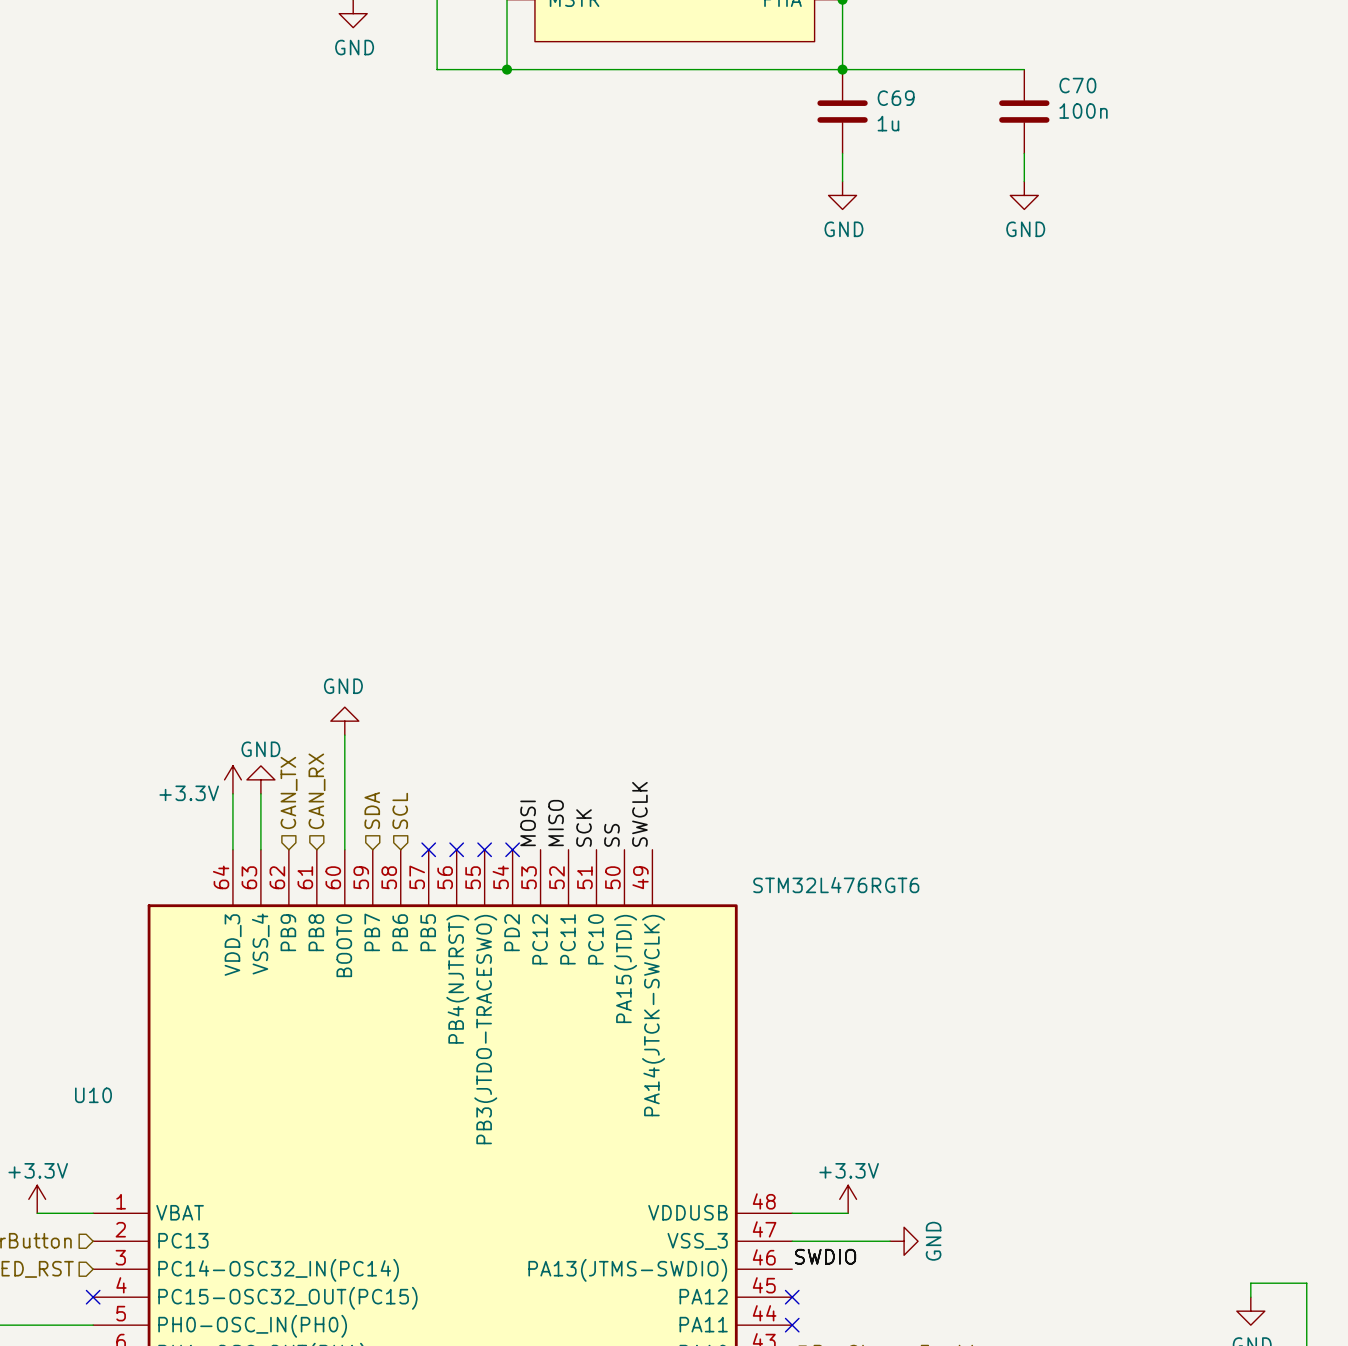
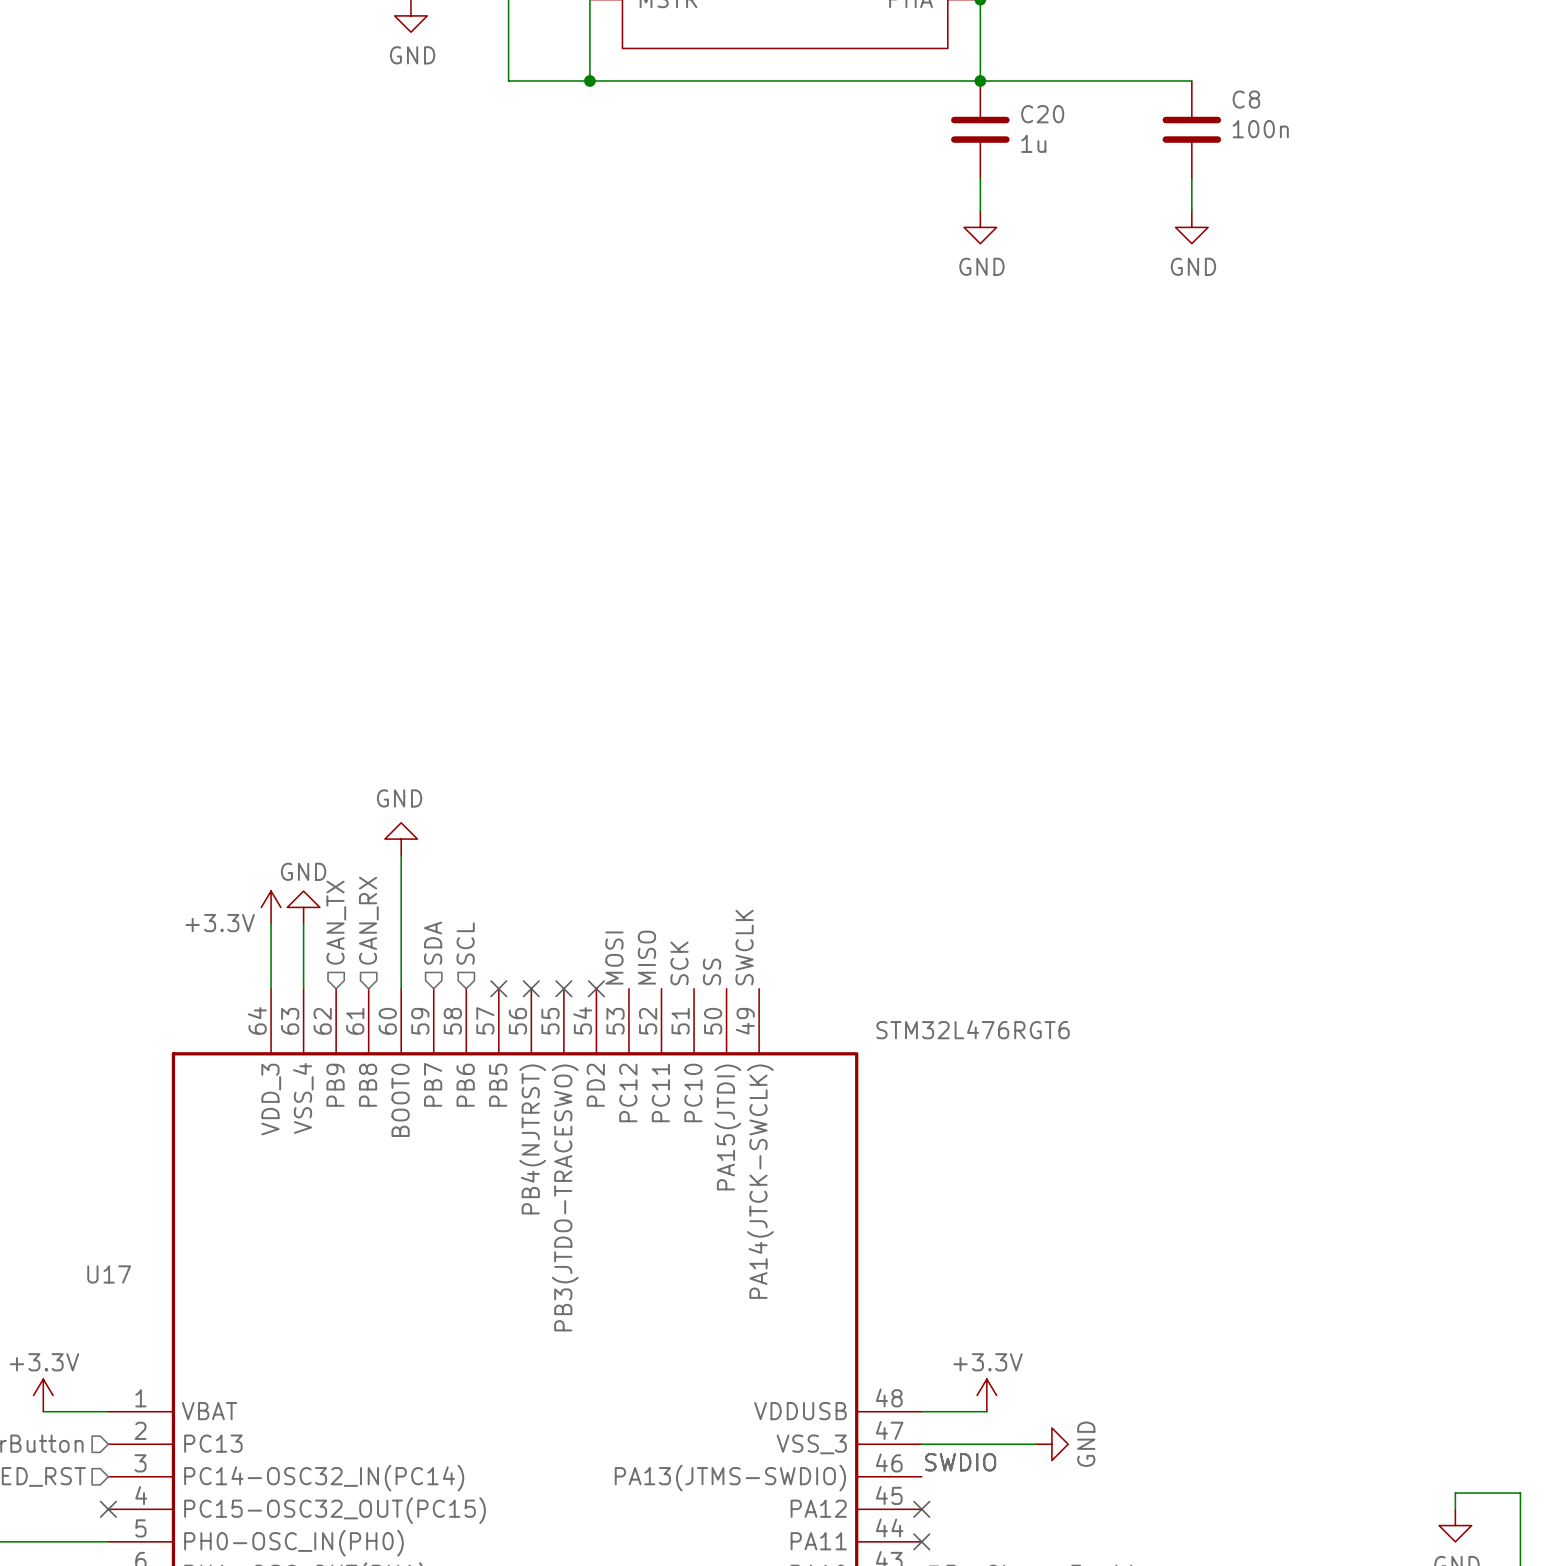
C70 name: C70 (1077, 85) -> C8 (1246, 99)
C69 name: C69 (896, 98) -> C20 (1042, 114)
U10 name: U10 (93, 1095) -> U17 (109, 1274)

